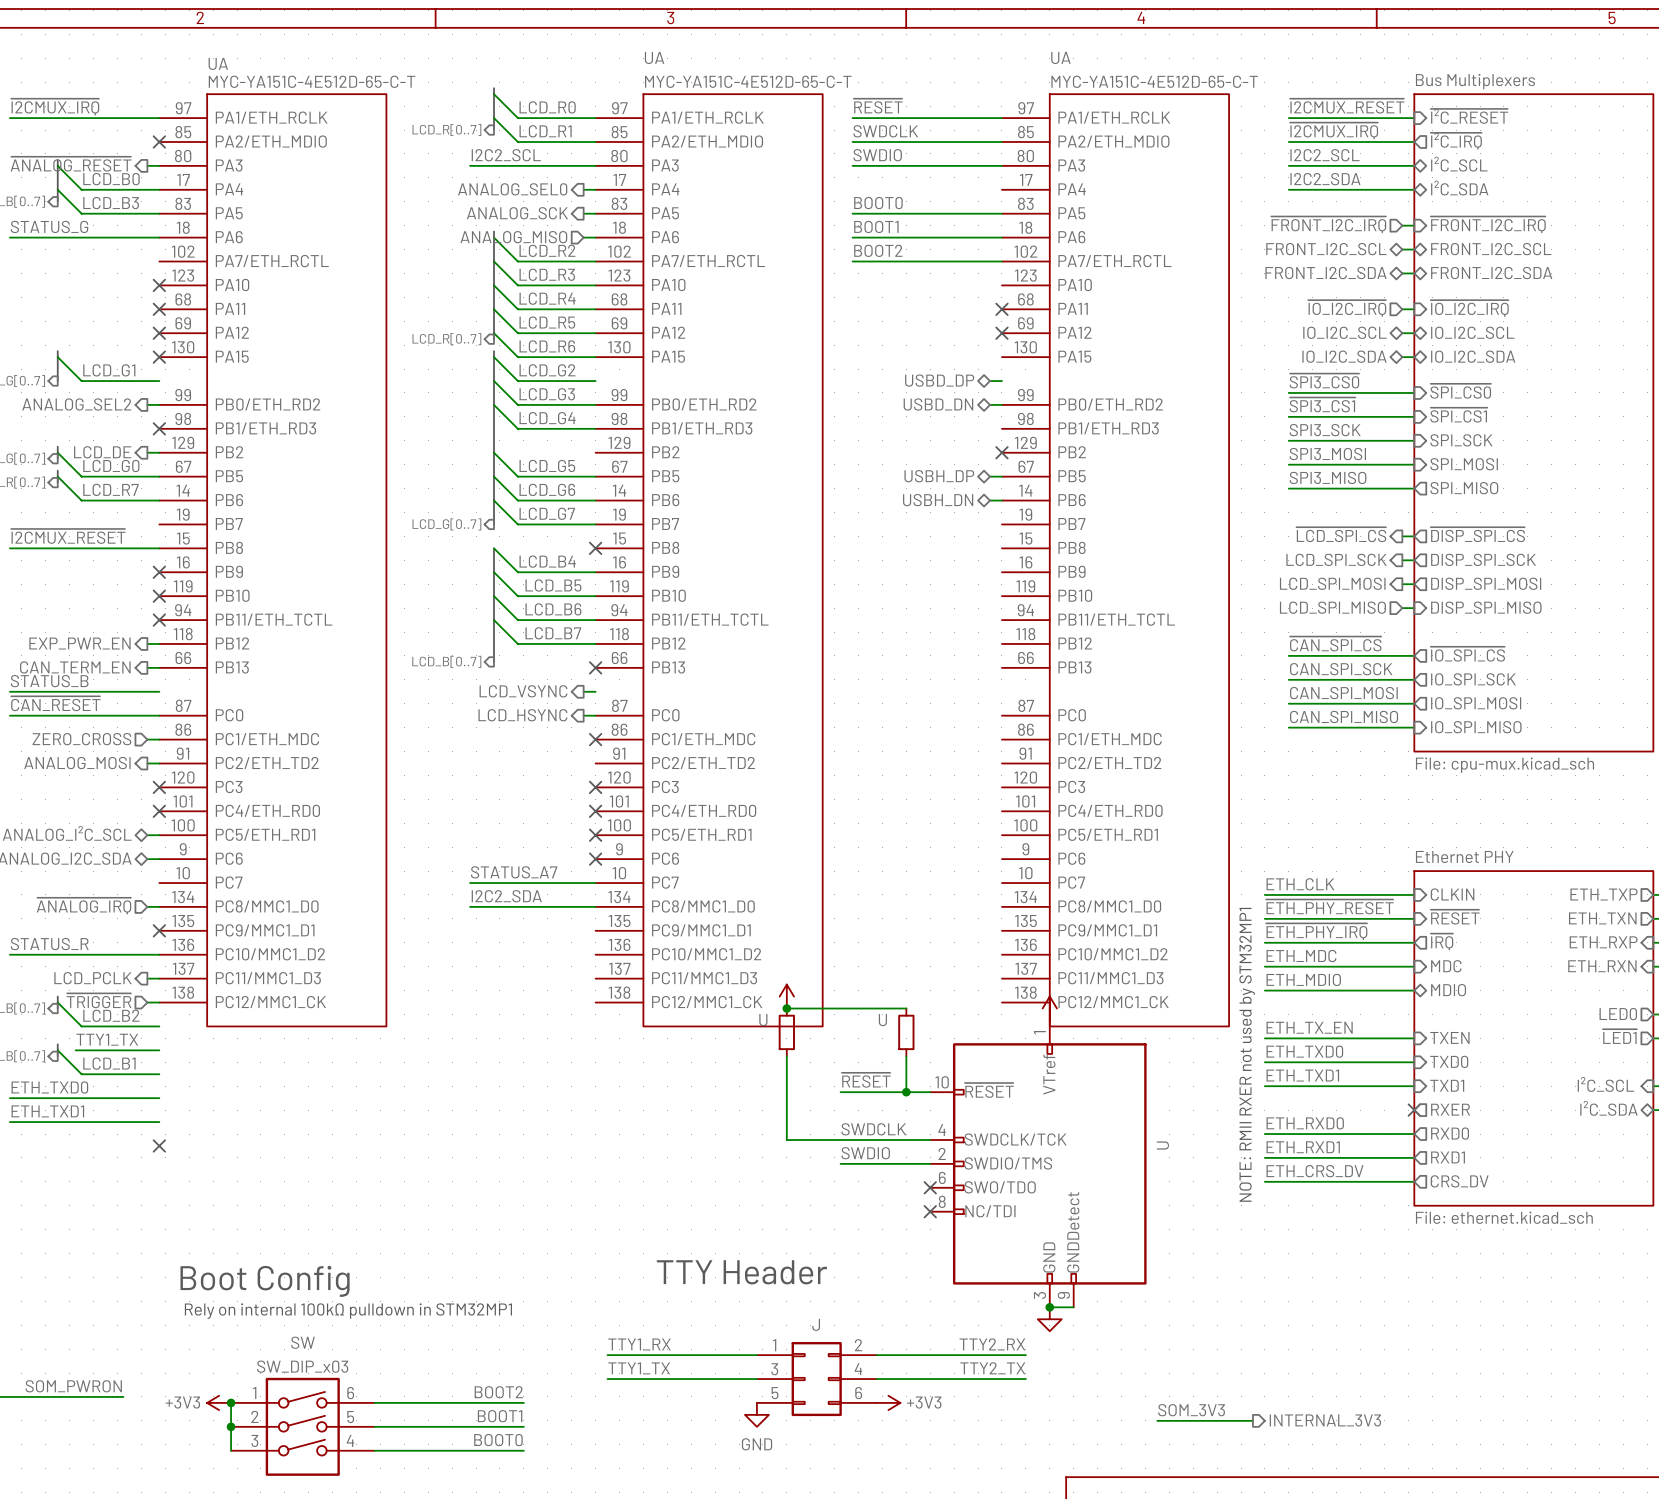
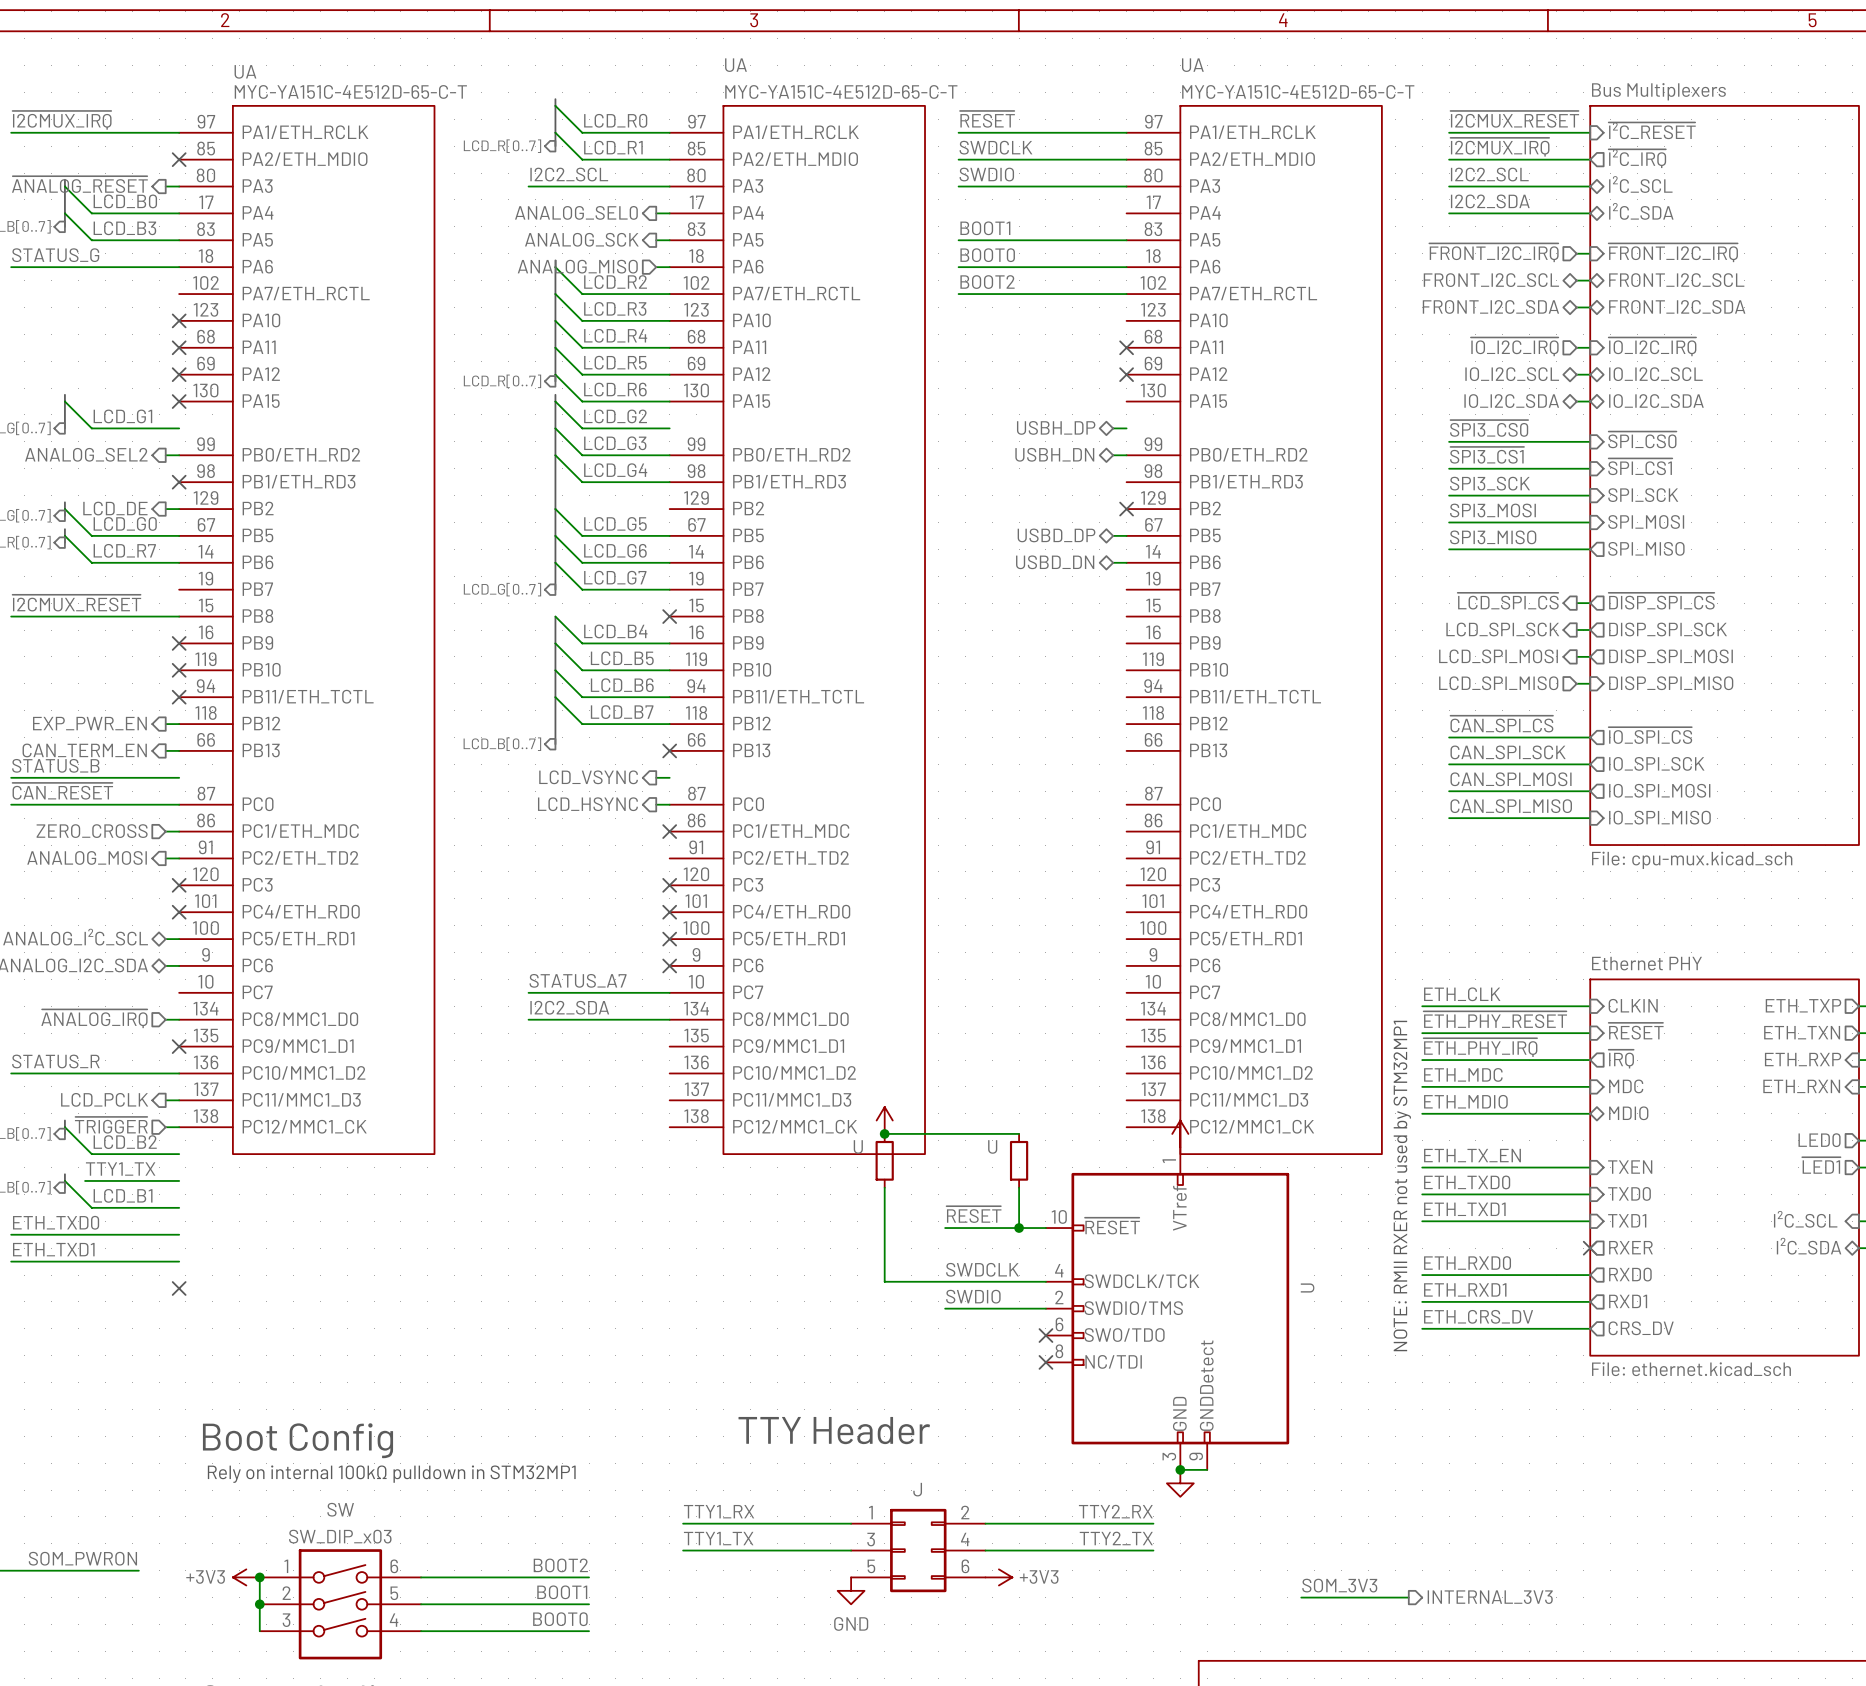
label: BOOT0 (878, 203) -> BOOT1 (985, 228)
label: BOOT1 (876, 226) -> BOOT0 (987, 255)
hierarchical label: USBD_DP (939, 380) -> USBH_DP (1056, 427)
hierarchical label: USBD_DN (938, 404) -> USBH_DN (1054, 454)
hierarchical label: USBH_DP (939, 476) -> USBD_DP (1056, 535)
hierarchical label: USBH_DN (938, 500) -> USBD_DN (1055, 562)

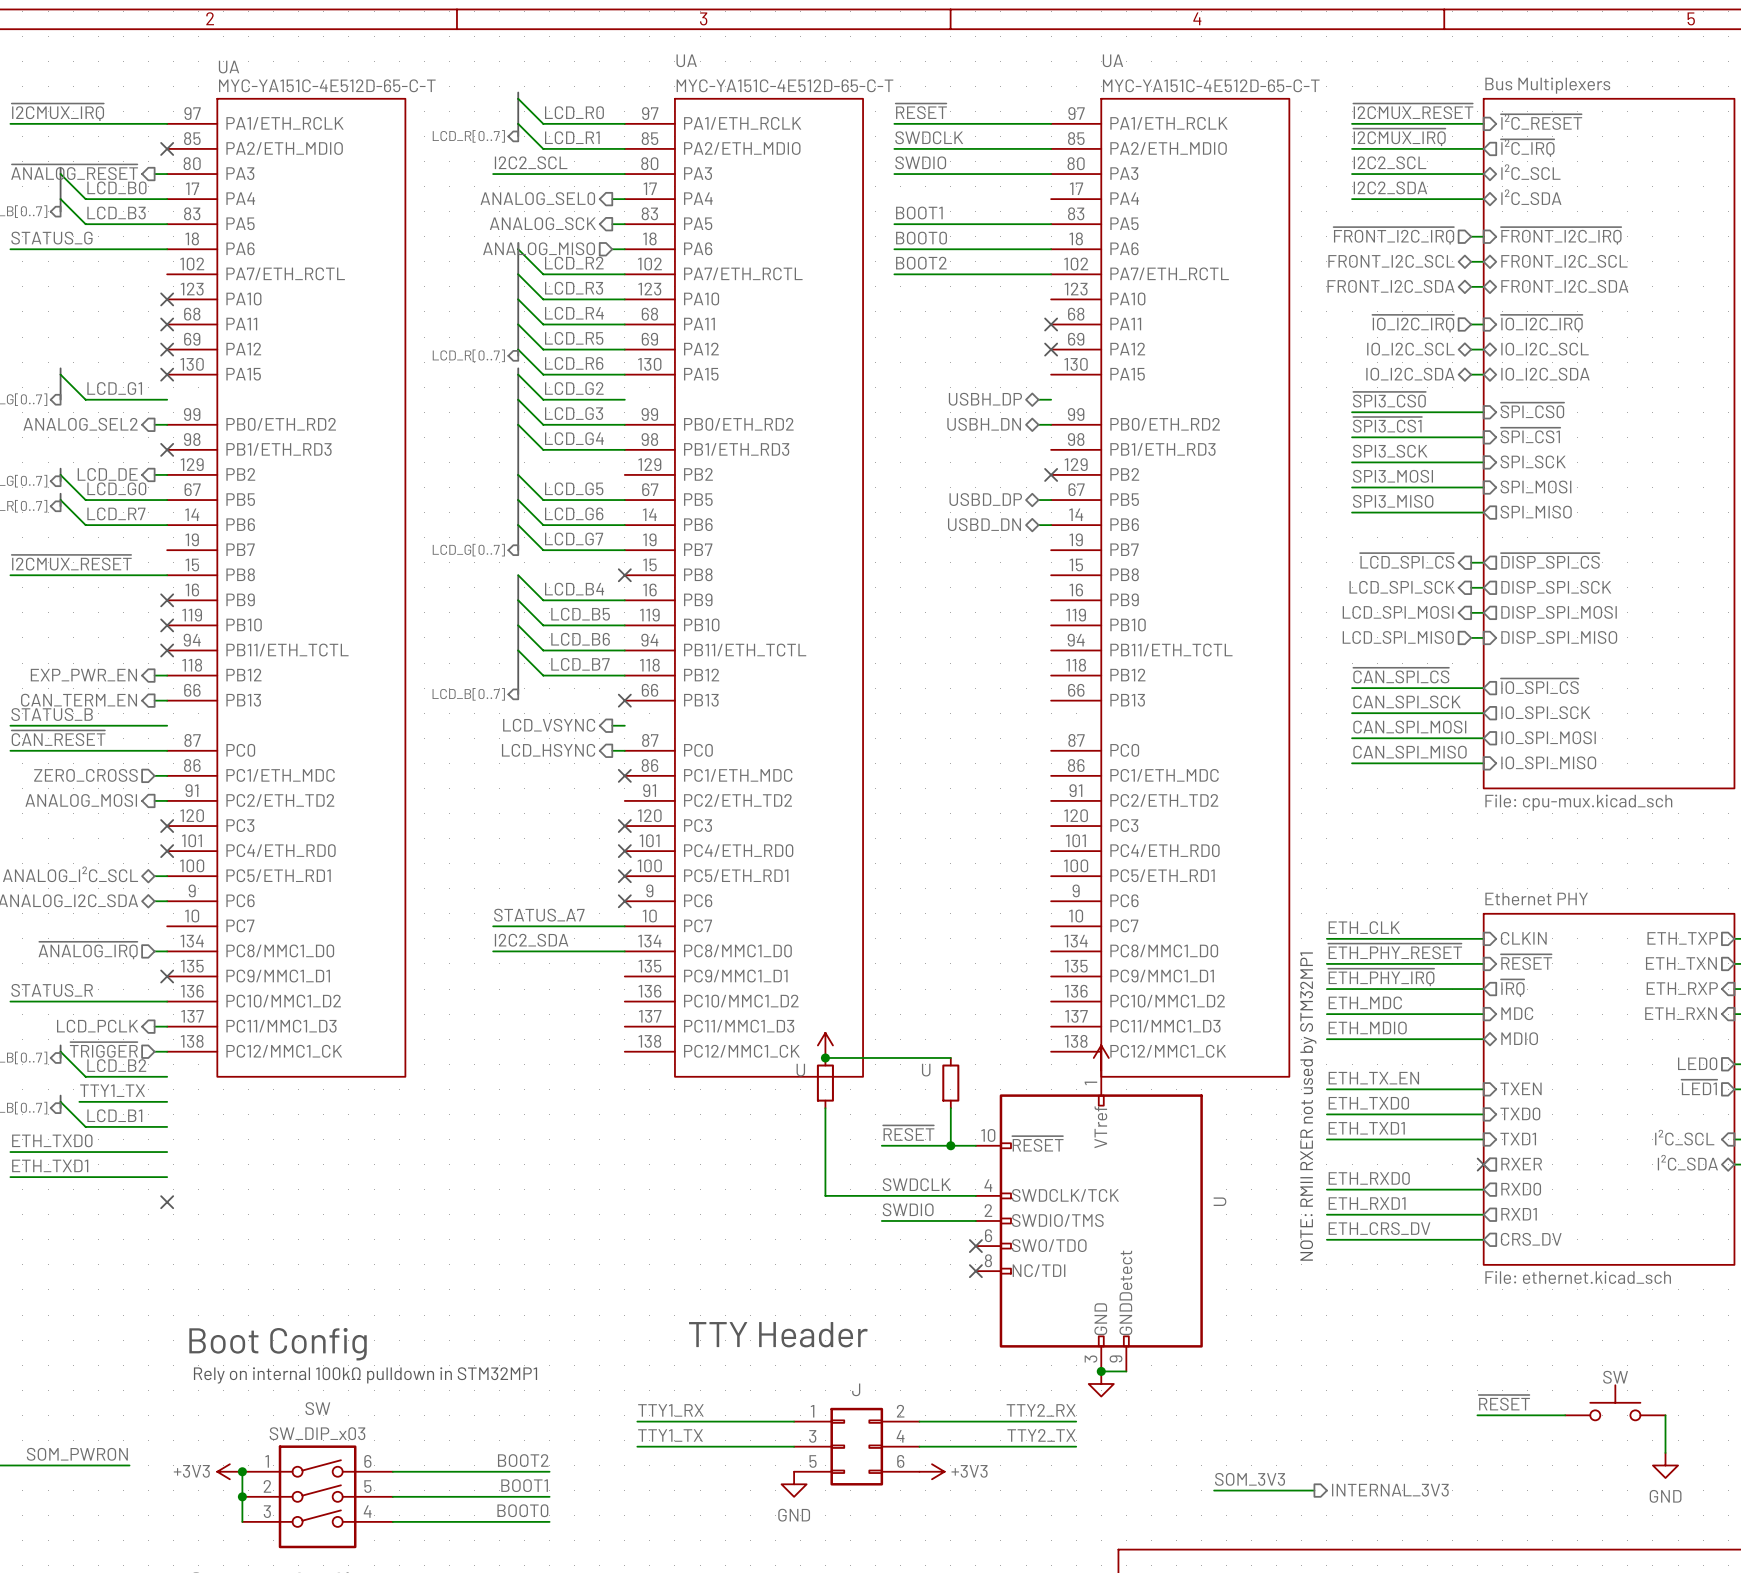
label: none -> ~{RESET} (1504, 1402)
SW: none -> (1615, 1402)
wire: none -> (1477, 1415) (1565, 1415)
wire: none -> (1665, 1415) (1665, 1452)
power symbol: none -> GND (1665, 1465)

